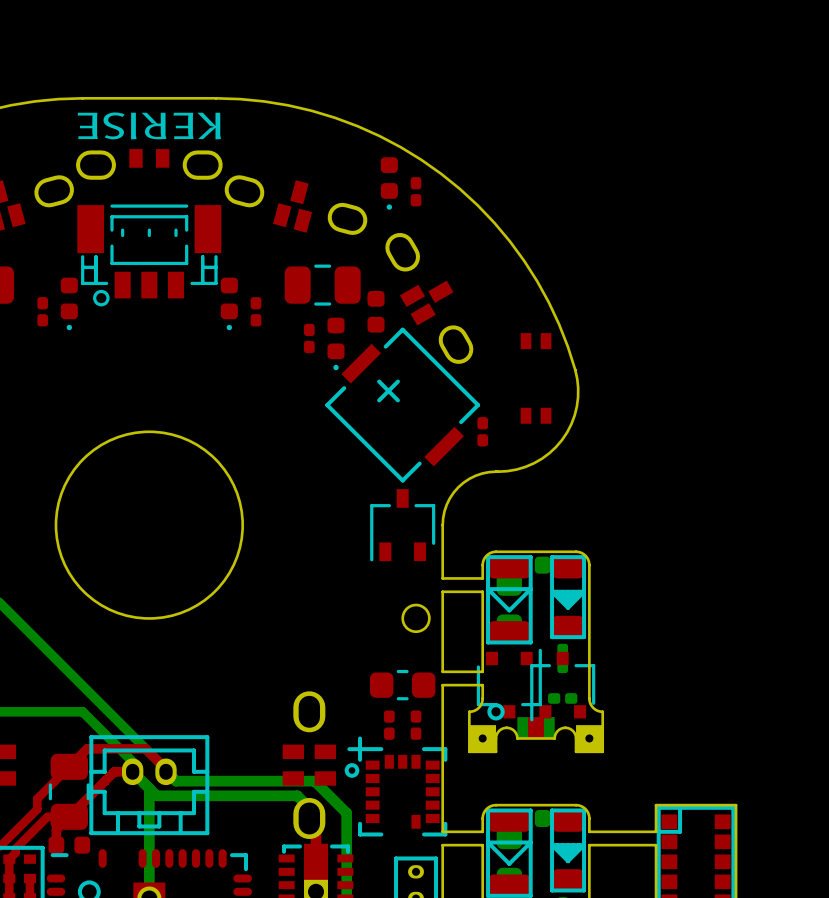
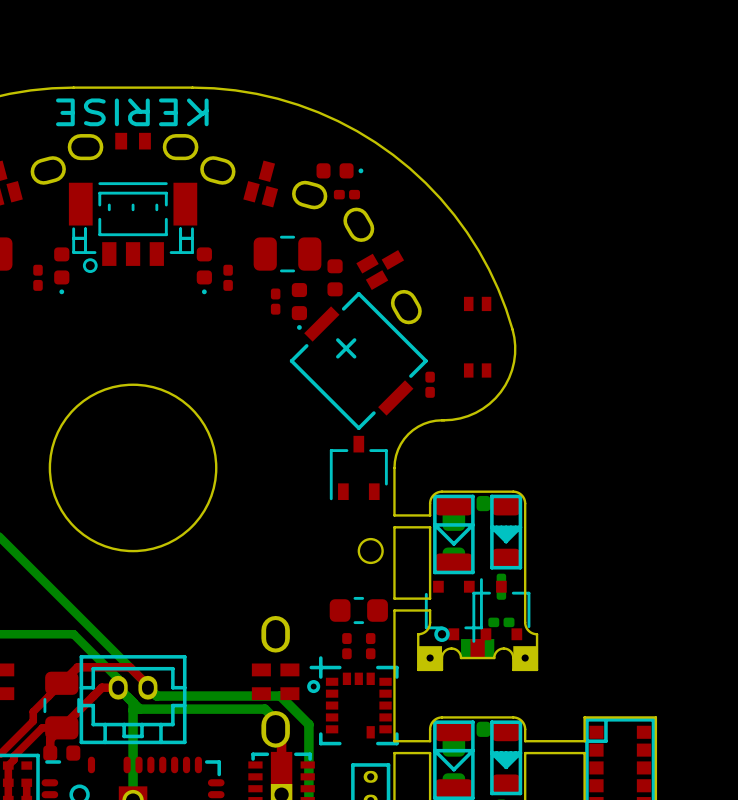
part rotation: 0° (389, 183) -> 90° counterclockwise (339, 170)
part rotation: 0° (416, 191) -> 90° clockwise (346, 194)
part position: (416, 191) -> (346, 194)

